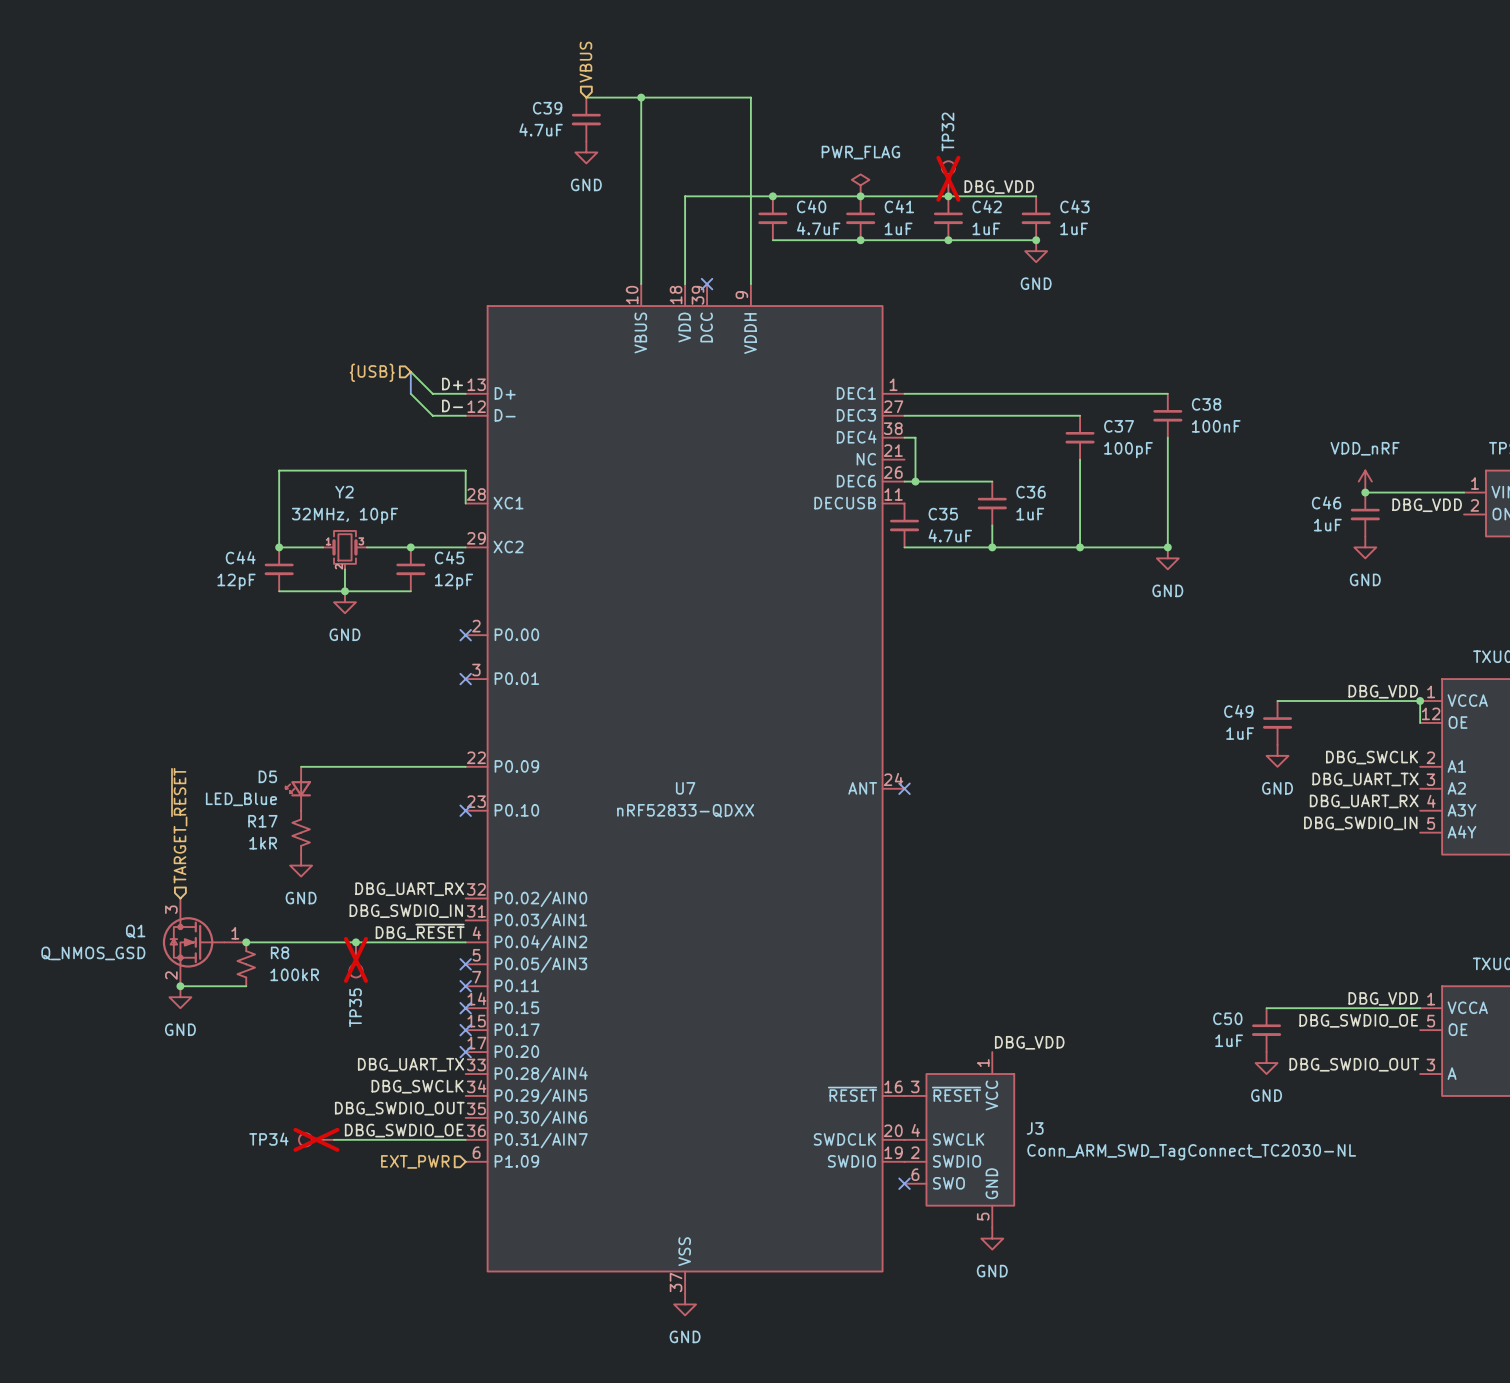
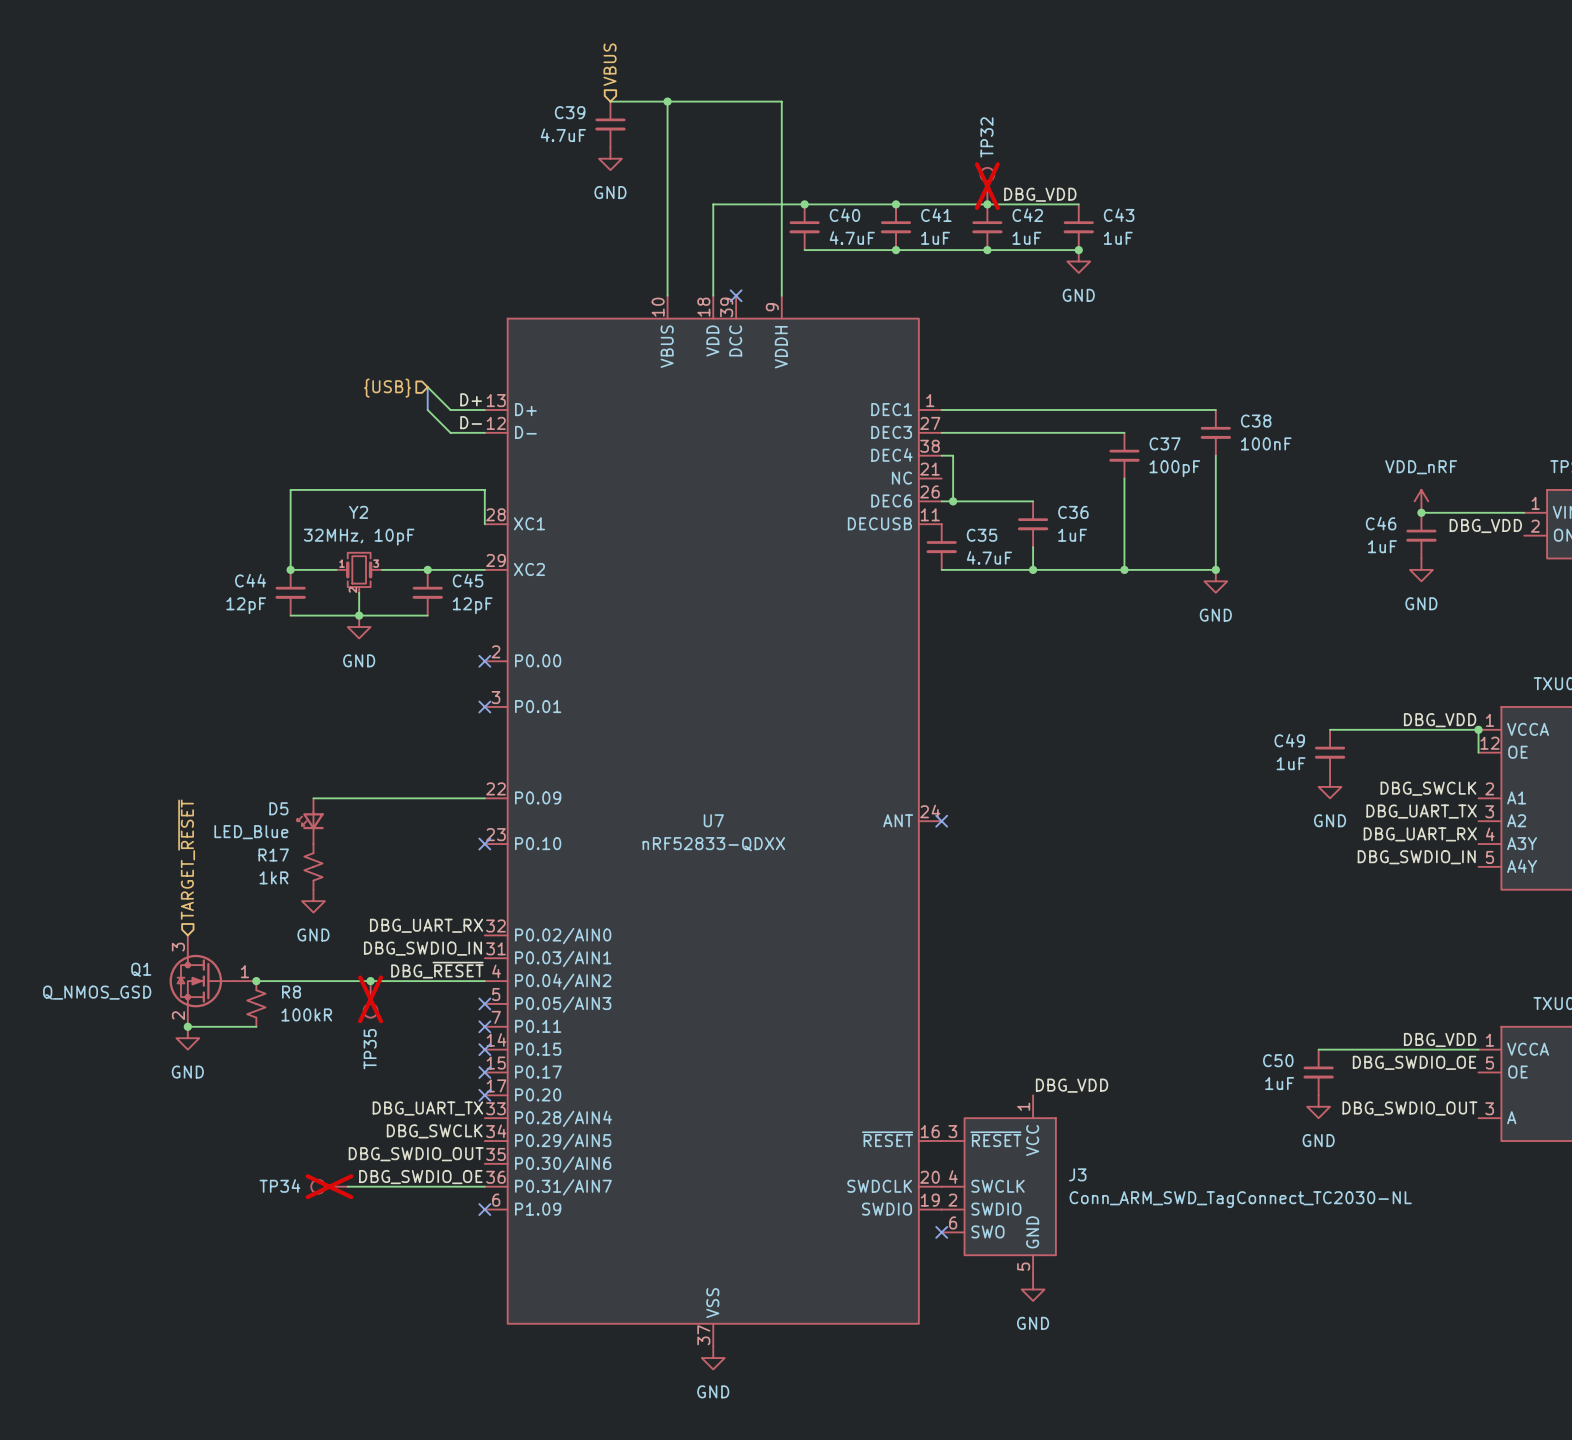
power symbol: PWR_FLAG (860, 185) -> none
hierarchical label: EXT_PWR (415, 1161) -> none
no-connect mark: none -> (484, 1209)

